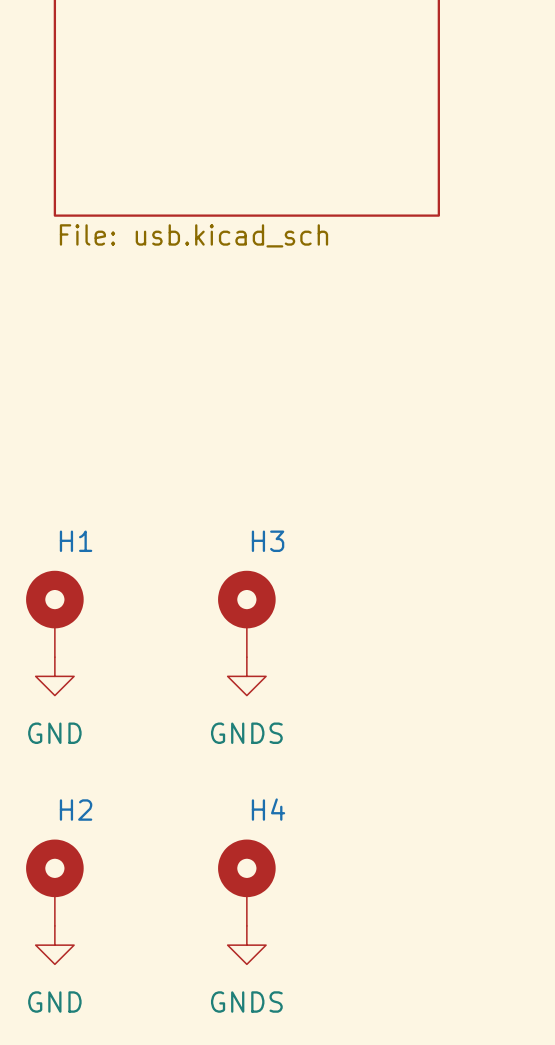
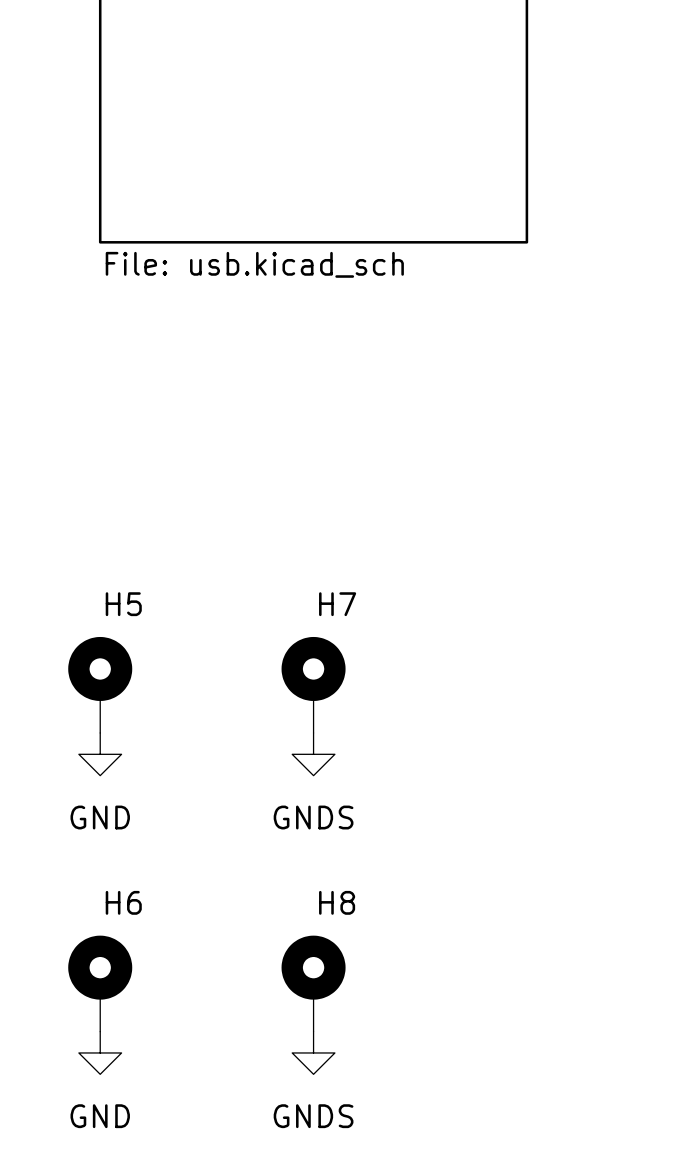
H1 name: H1 (76, 541) -> H5 (123, 604)
H3 name: H3 (268, 541) -> H7 (337, 604)
H4 name: H4 (268, 809) -> H8 (337, 902)
H2 name: H2 (76, 810) -> H6 (123, 902)

